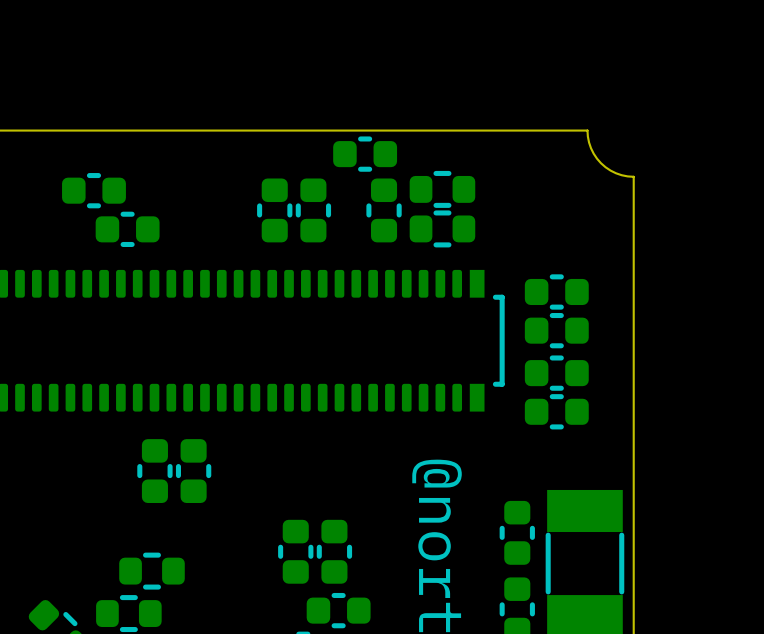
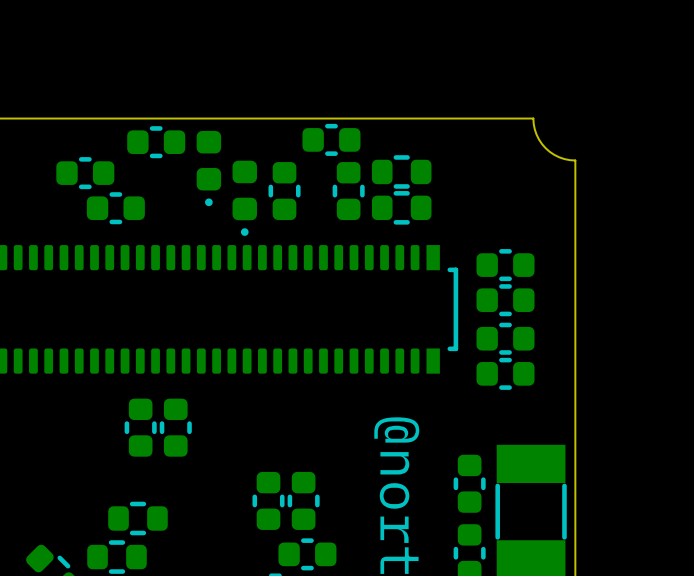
part: none -> (156, 142)
part footprint: [257, 178, 293, 243] -> [232, 160, 257, 236]
part: none -> (208, 168)

